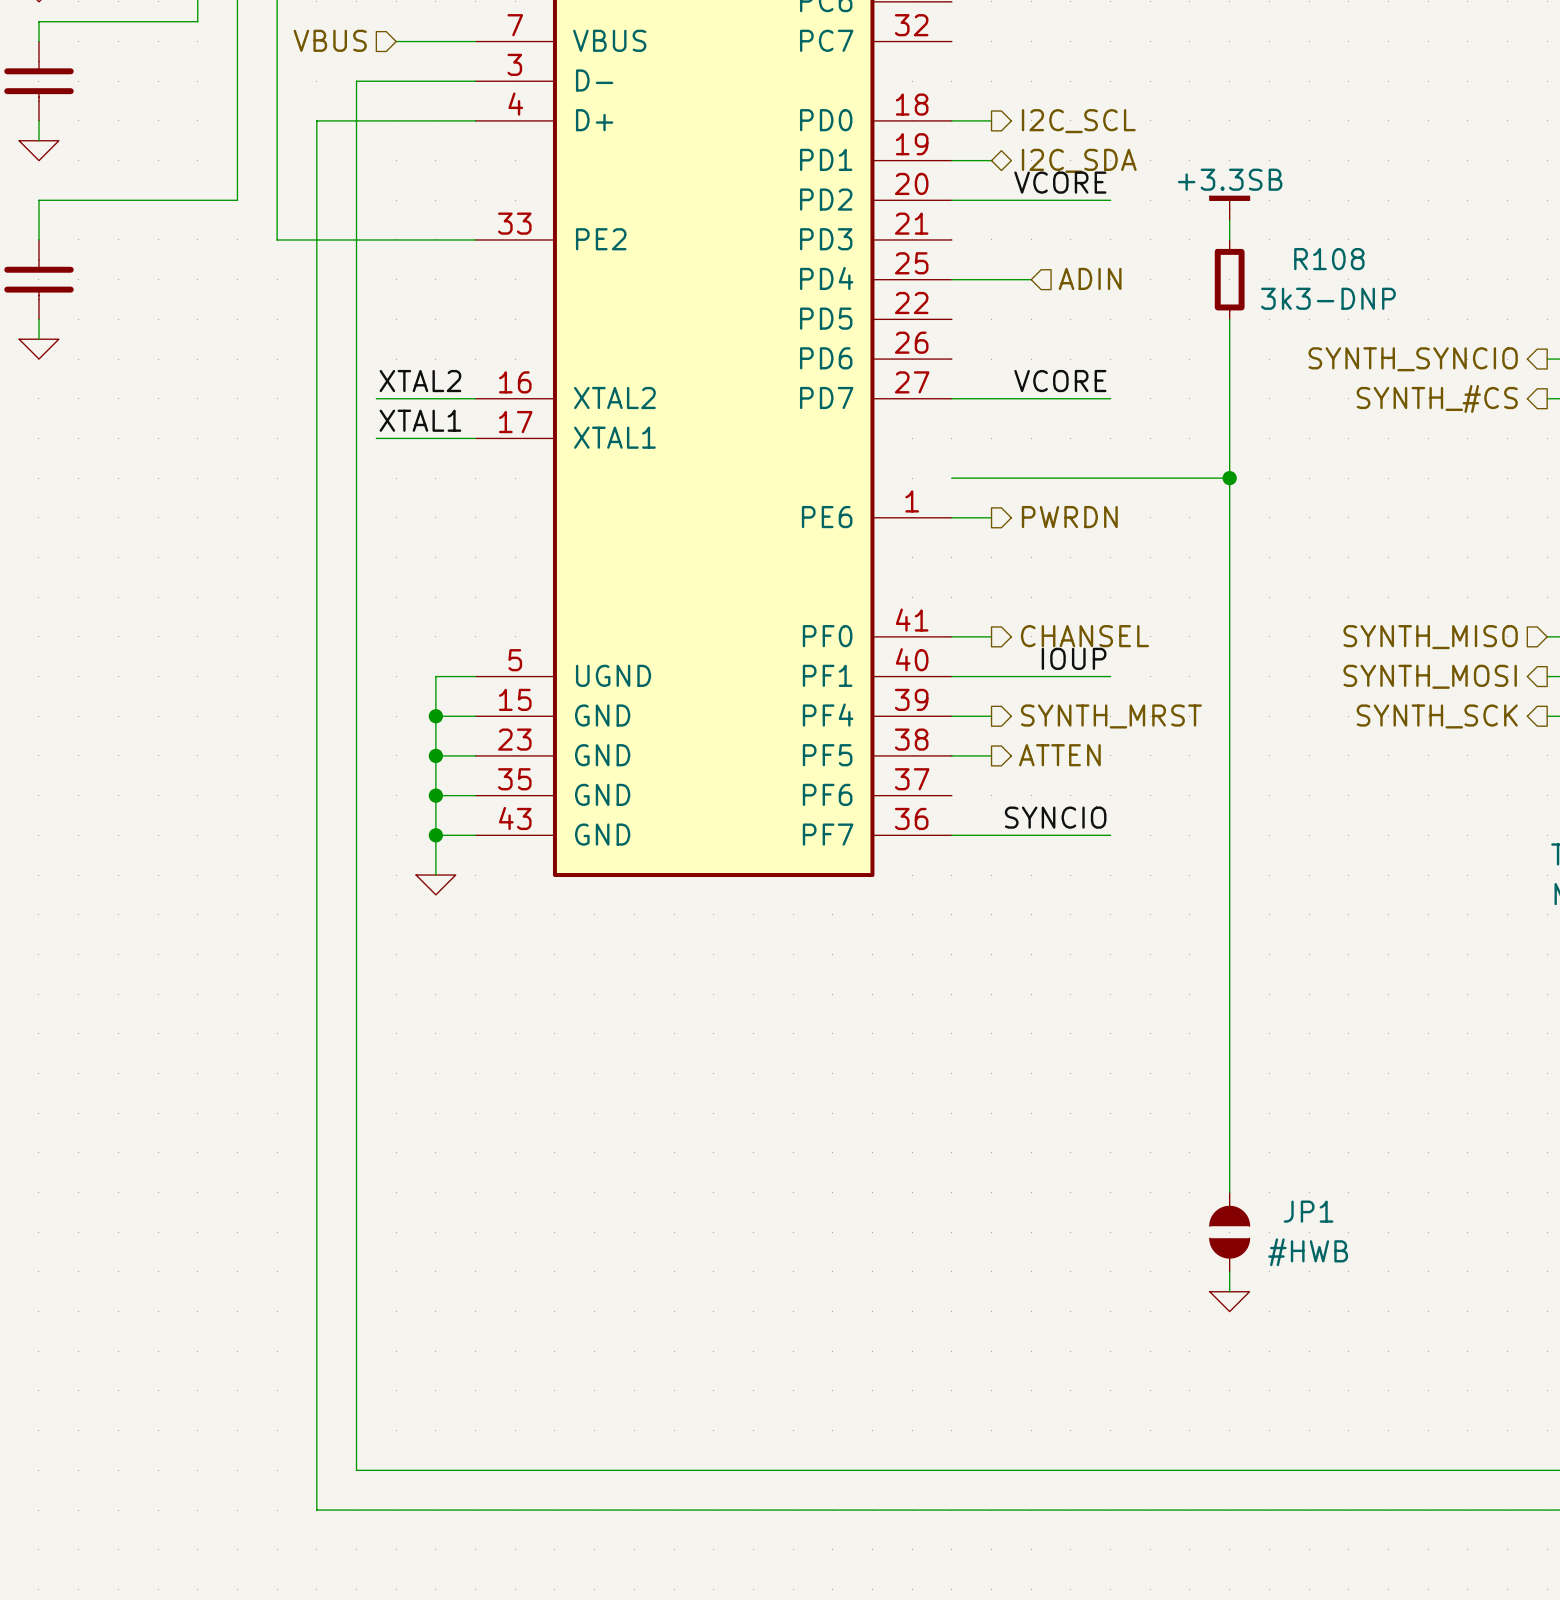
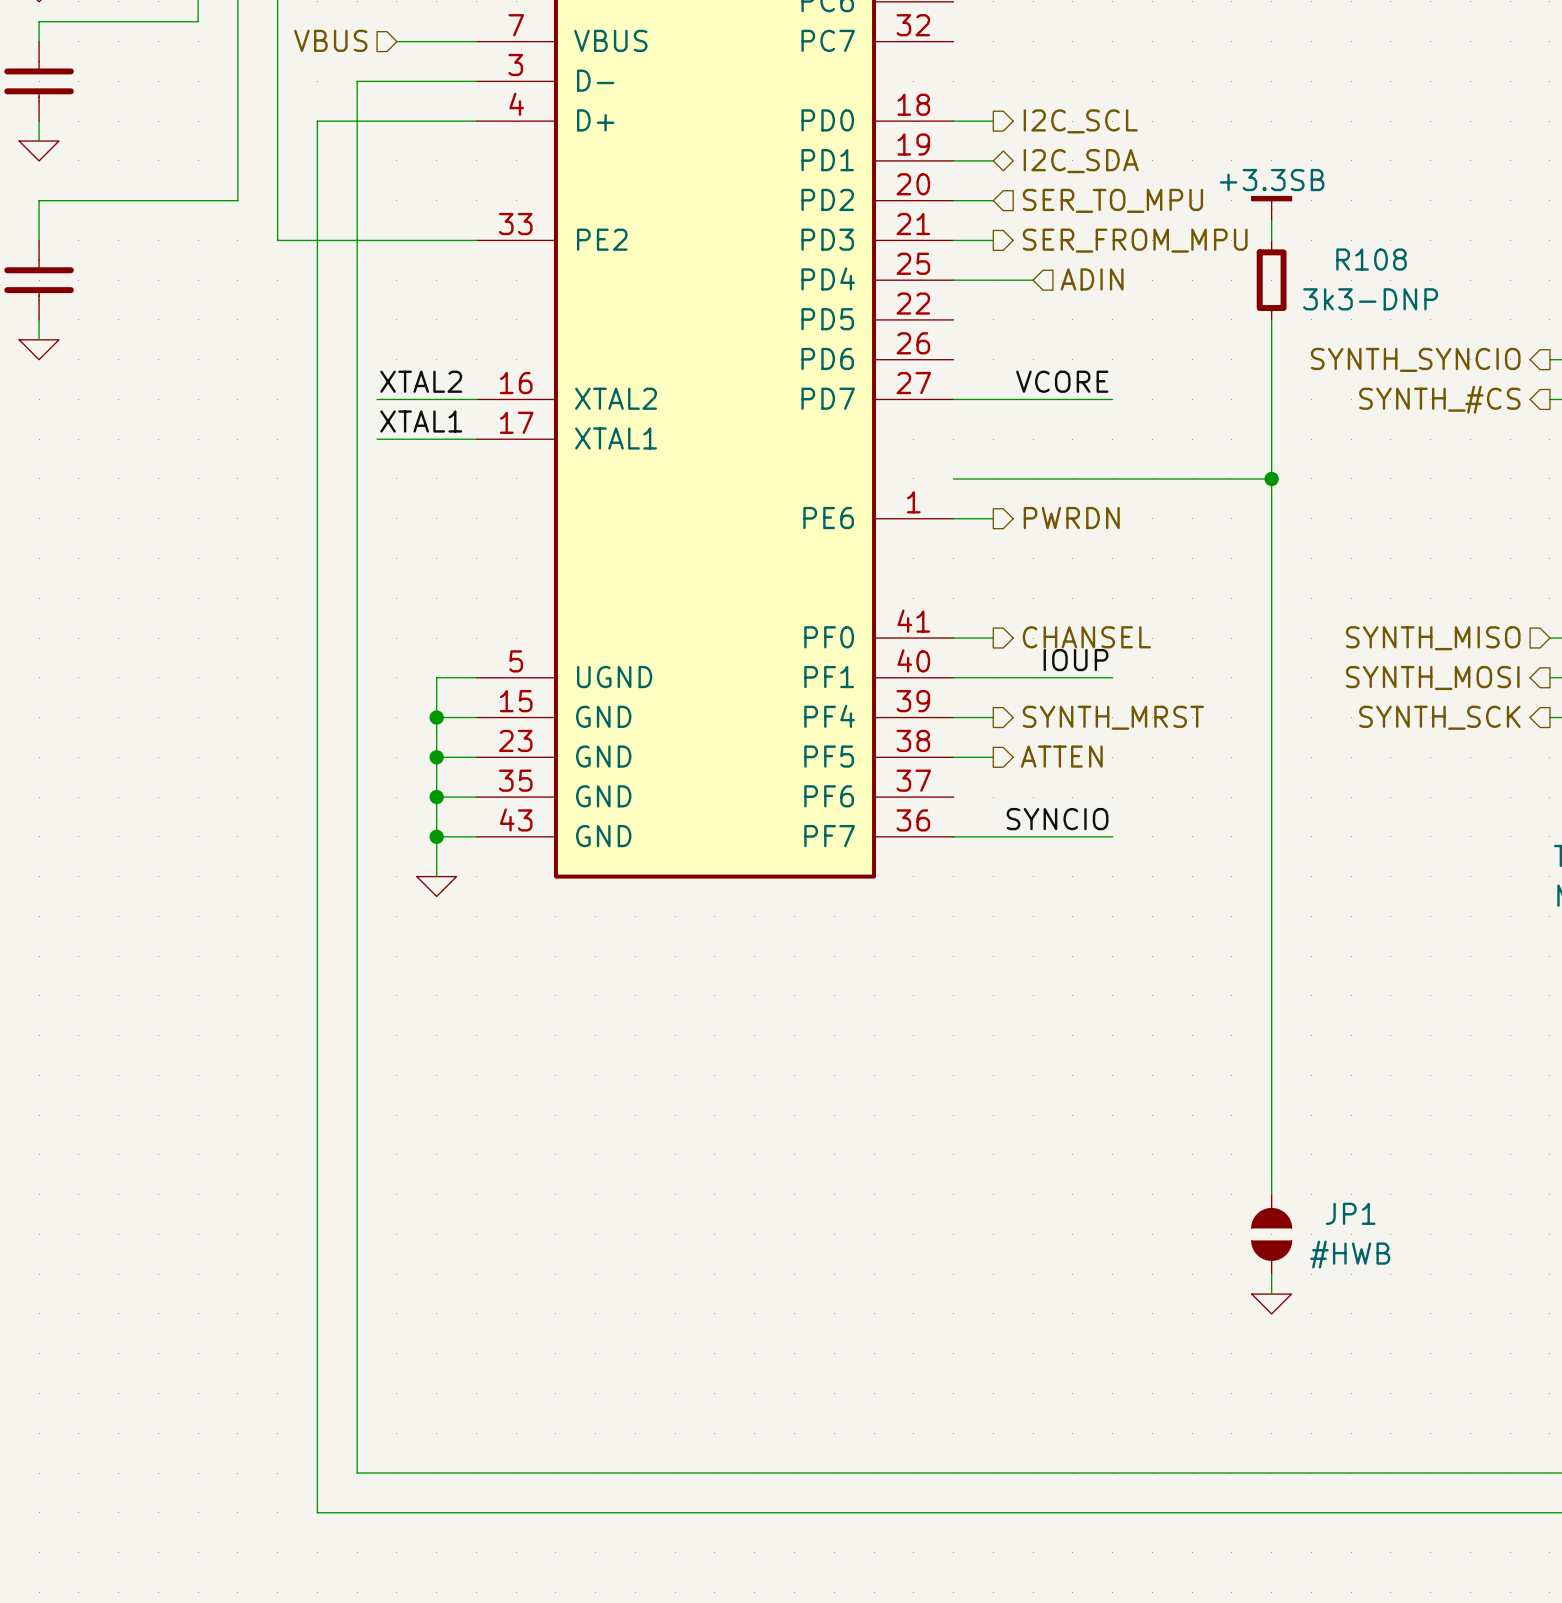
label: VCORE (1060, 182) -> none
wire: (991, 200) (1110, 200) -> none
hierarchical label: none -> SER_TO_MPU (1112, 200)
power symbol position: +3.3SB (1229, 208) -> +3.3SB (1271, 208)
wire: (1229, 220) (1229, 239) -> (1271, 220) (1271, 240)
wire: none -> (953, 240) (993, 240)
hierarchical label: none -> SER_FROM_MPU (1135, 240)
R108 position: (1229, 279) -> (1271, 280)
wire: (1229, 319) (1229, 1192) -> (1271, 319) (1271, 1194)
wire: none -> (1231, 478) (1271, 478)
junction position: (1229, 478) -> (1271, 478)
JP1 position: (1229, 1232) -> (1271, 1234)
wire: (1229, 1271) (1229, 1291) -> (1271, 1274) (1271, 1294)
power symbol position: (1229, 1301) -> (1271, 1304)

